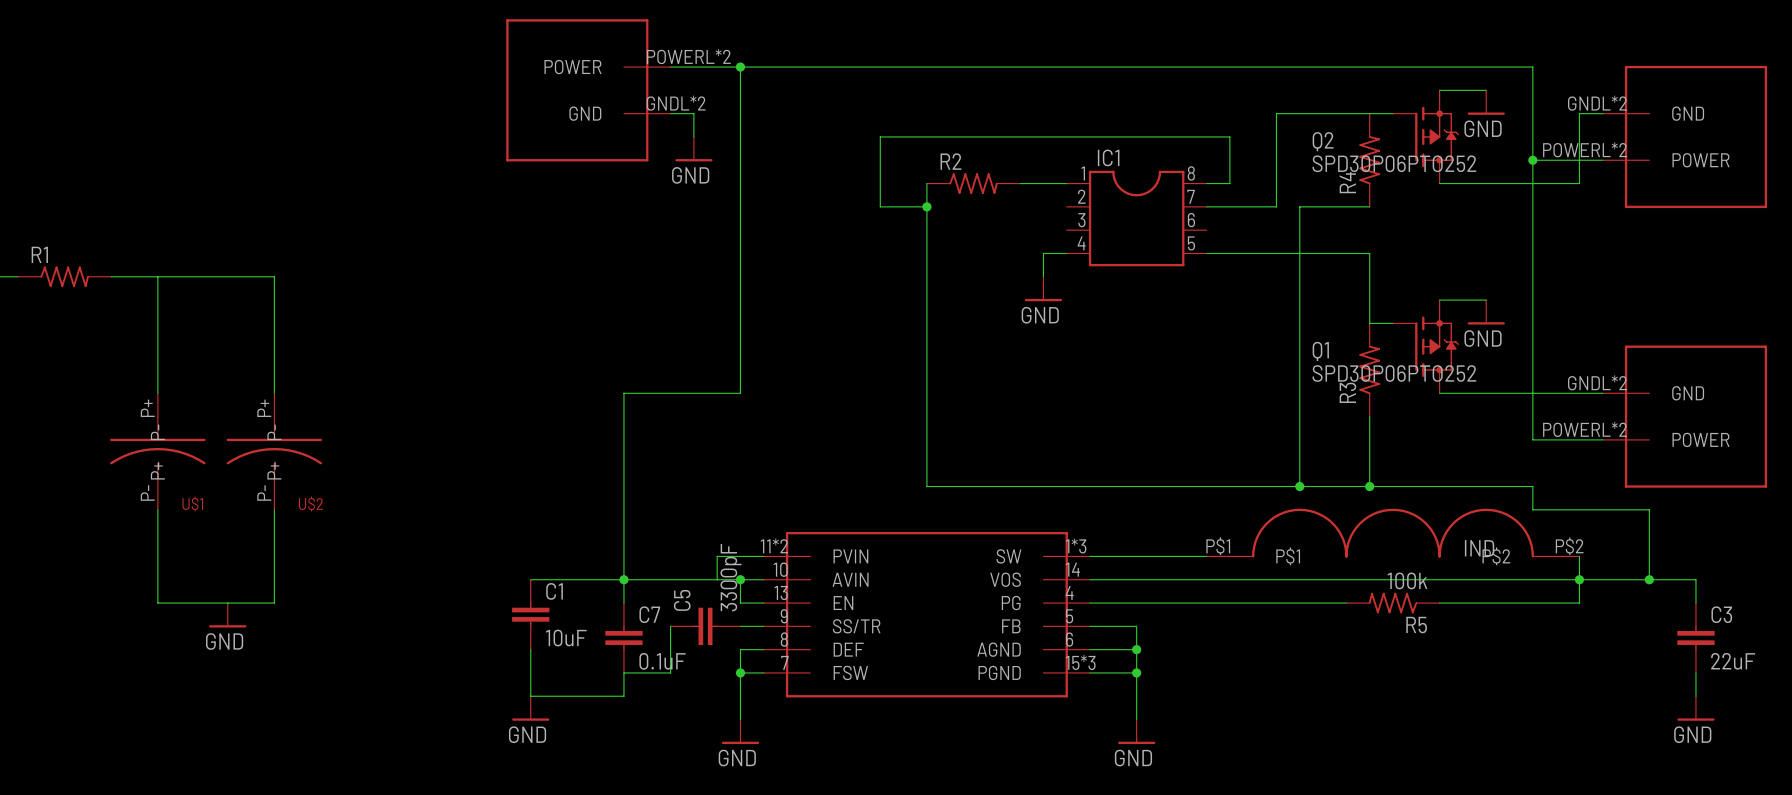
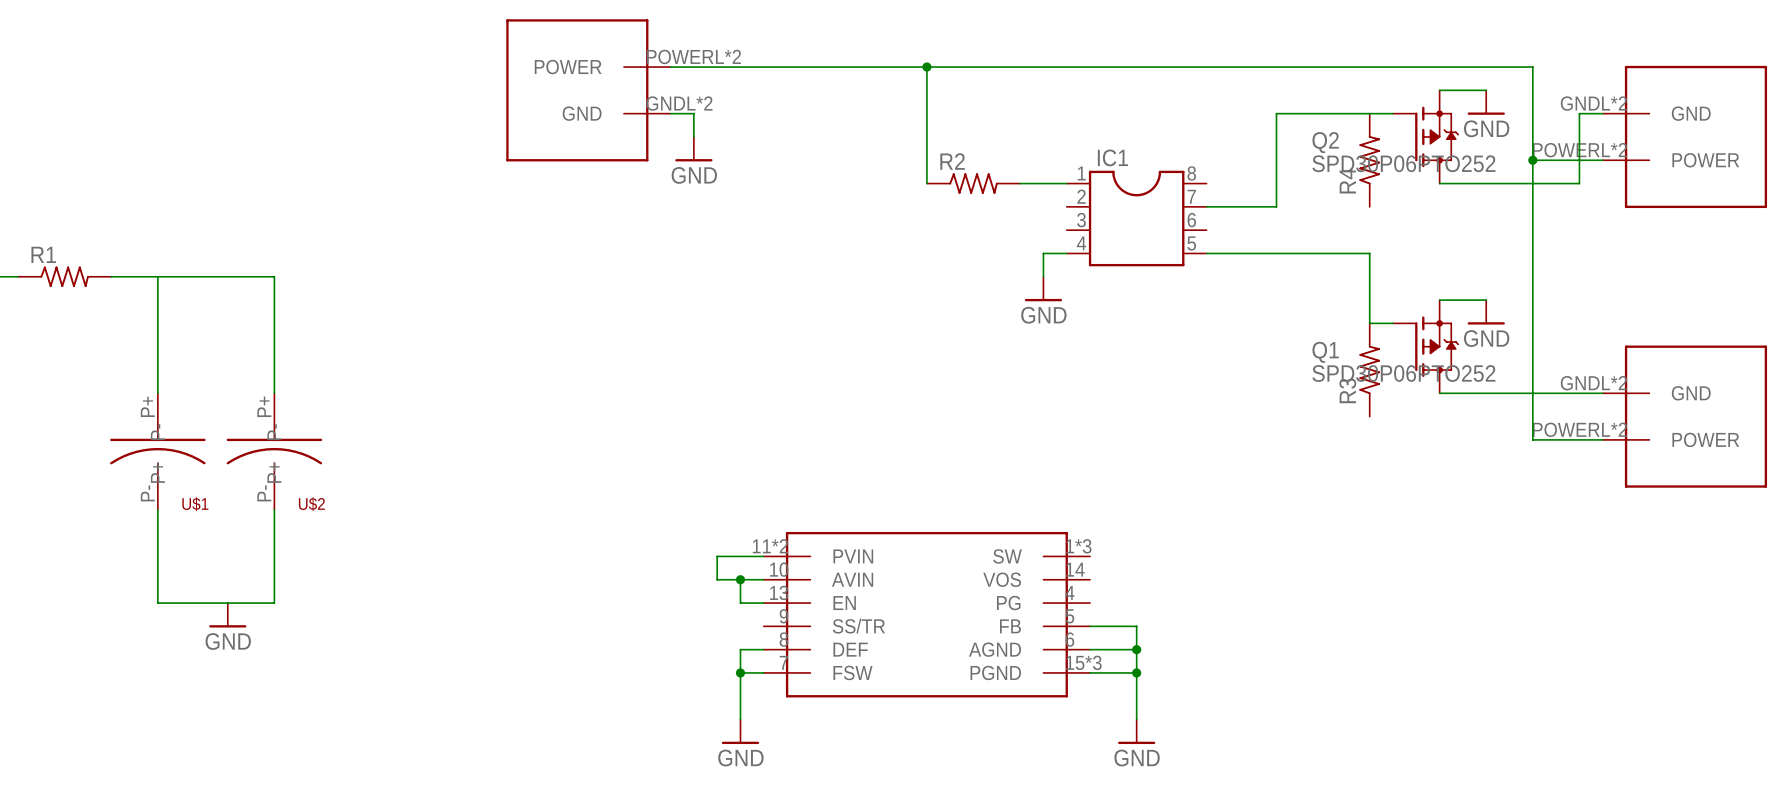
wire: (740, 67) (740, 393) (623, 393) (623, 603) -> none
junction: (740, 67) -> none
junction: none -> (926, 67)
wire: (926, 183) (926, 486) (1532, 486) (1532, 509) (1649, 509) (1649, 579) -> (926, 183) (926, 67)
wire: (1206, 183) (1229, 183) (1229, 136) (880, 136) (880, 206) (926, 206) -> none
junction: (926, 206) -> none
wire: (1369, 206) (1299, 206) (1299, 486) -> none
wire: (1369, 416) (1369, 486) -> none
junction: (1299, 486) -> none
junction: (1369, 486) -> none
part: (1393, 533) -> none
wire: (1090, 556) (1206, 556) -> none
wire: (1579, 556) (1579, 603) (1439, 603) -> none
wire: (530, 579) (717, 579) -> none
junction: (623, 579) -> none
wire: (1090, 579) (1695, 579) (1695, 603) -> none
junction: (1579, 579) -> none
junction: (1649, 579) -> none
wire: (1090, 603) (1346, 603) -> none
R5: 100k (1393, 603) -> none
C1: 10uF (530, 614) -> none
wire: (670, 626) (670, 672) (623, 672) (623, 696) (530, 696) (530, 649) -> none
C5: 3300pF (705, 626) -> none
wire: (740, 626) (763, 626) -> none
C7: 0.1uF (623, 638) -> none
C3: 22uF (1695, 638) -> none
wire: (1695, 672) (1695, 696) -> none
power symbol: GND (530, 708) -> none
power symbol: GND (1695, 708) -> none

